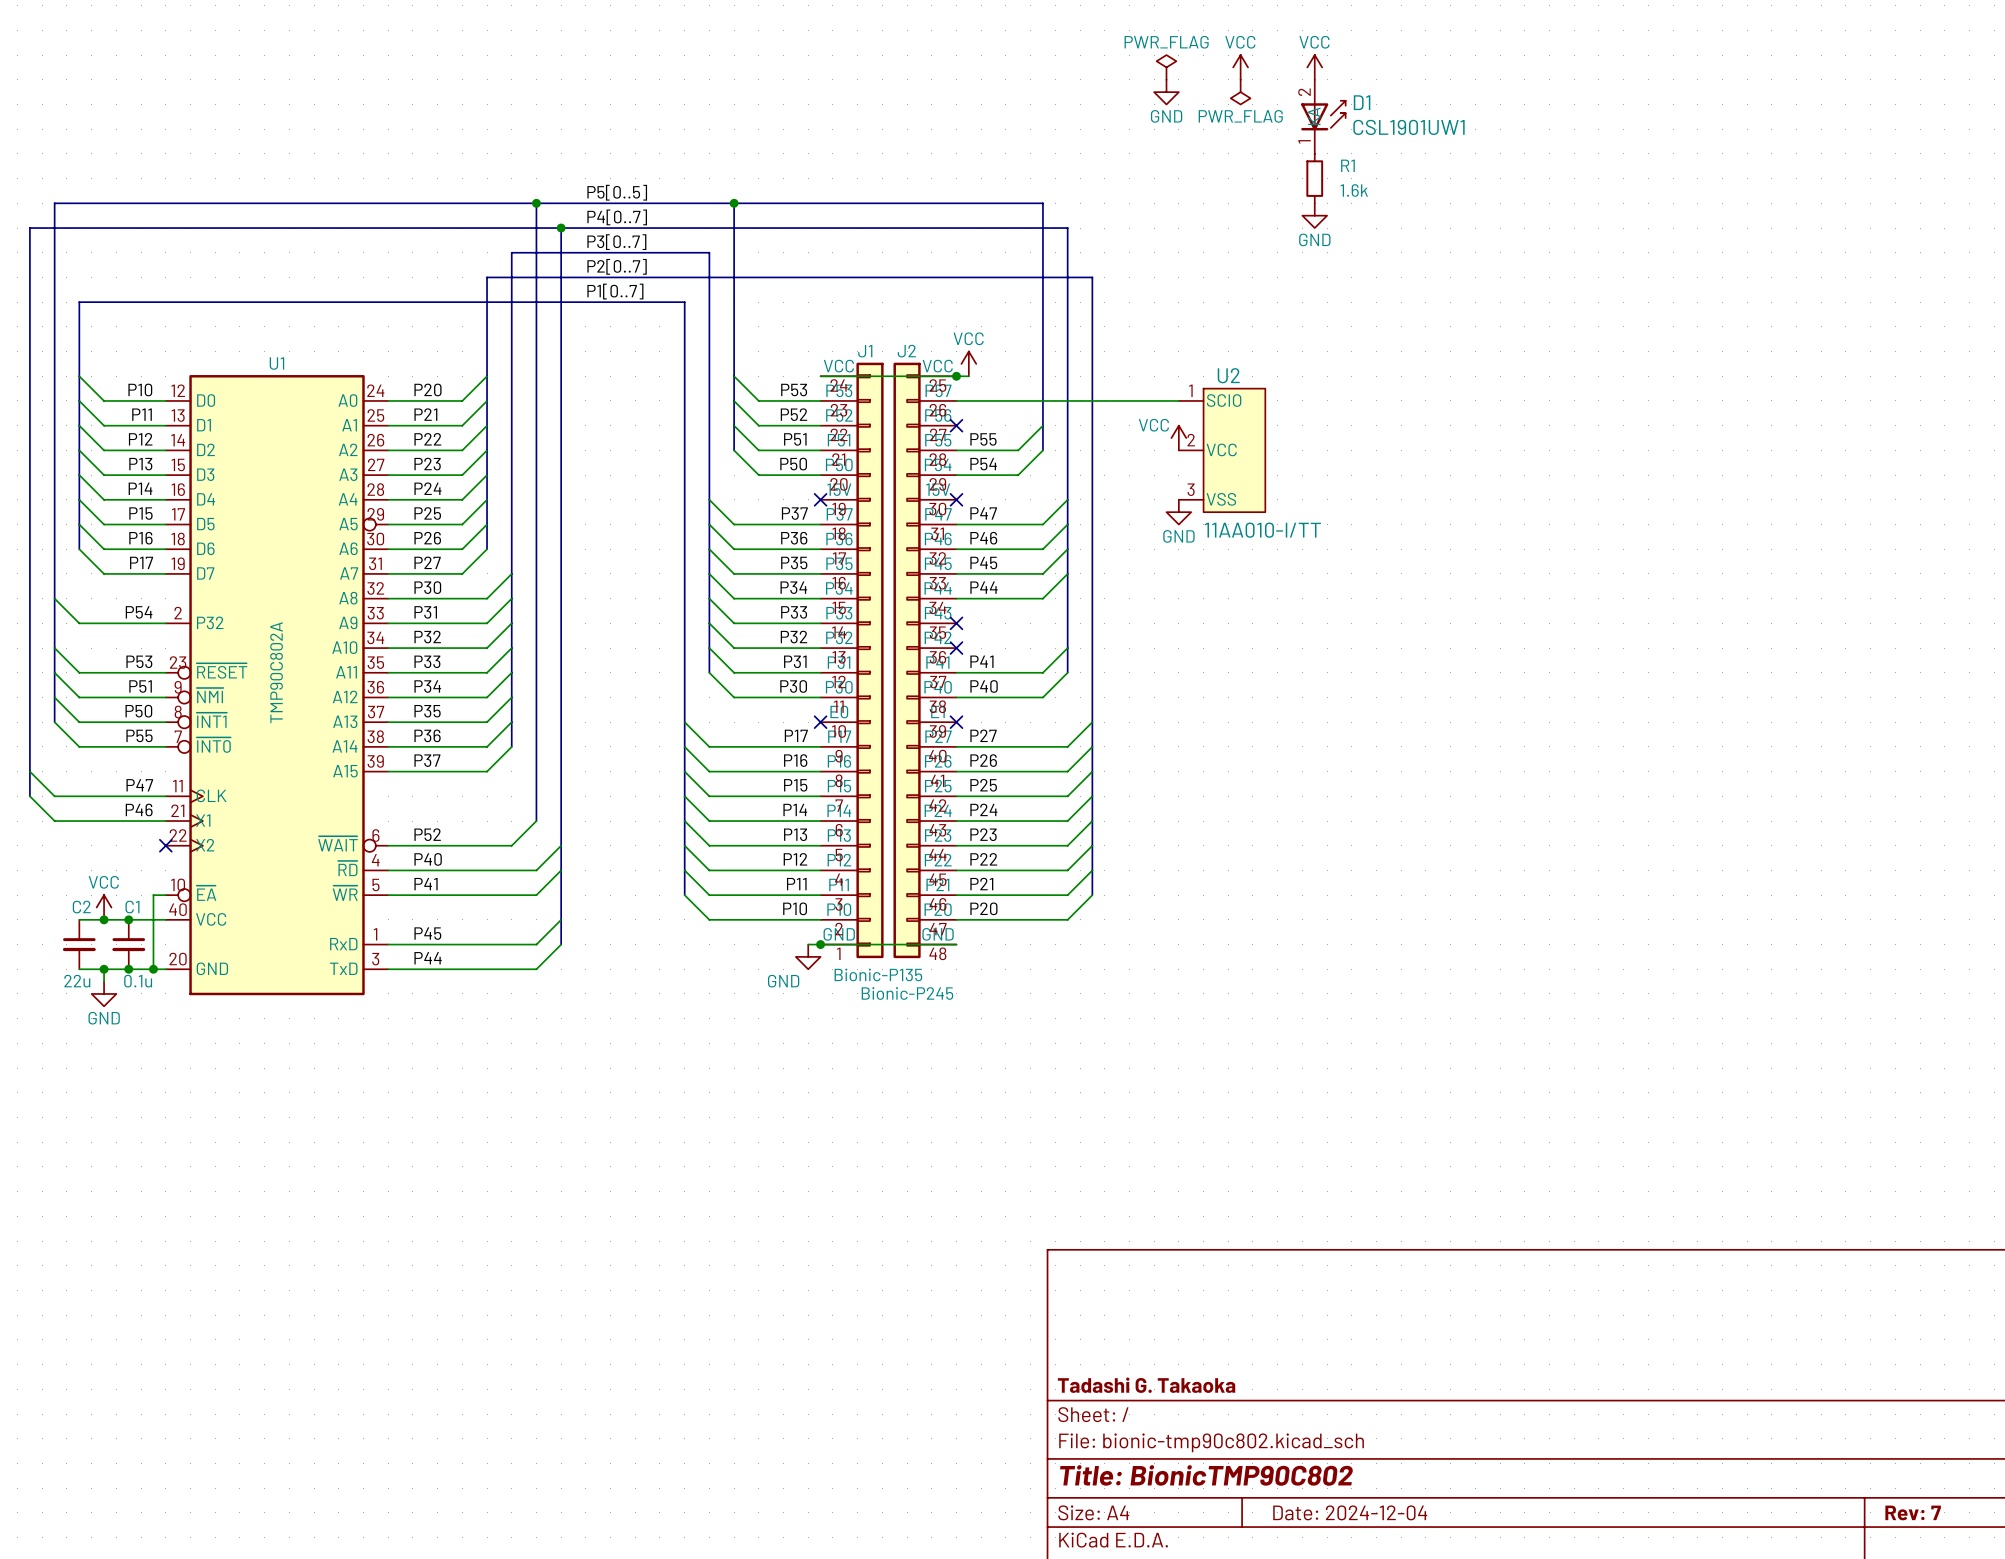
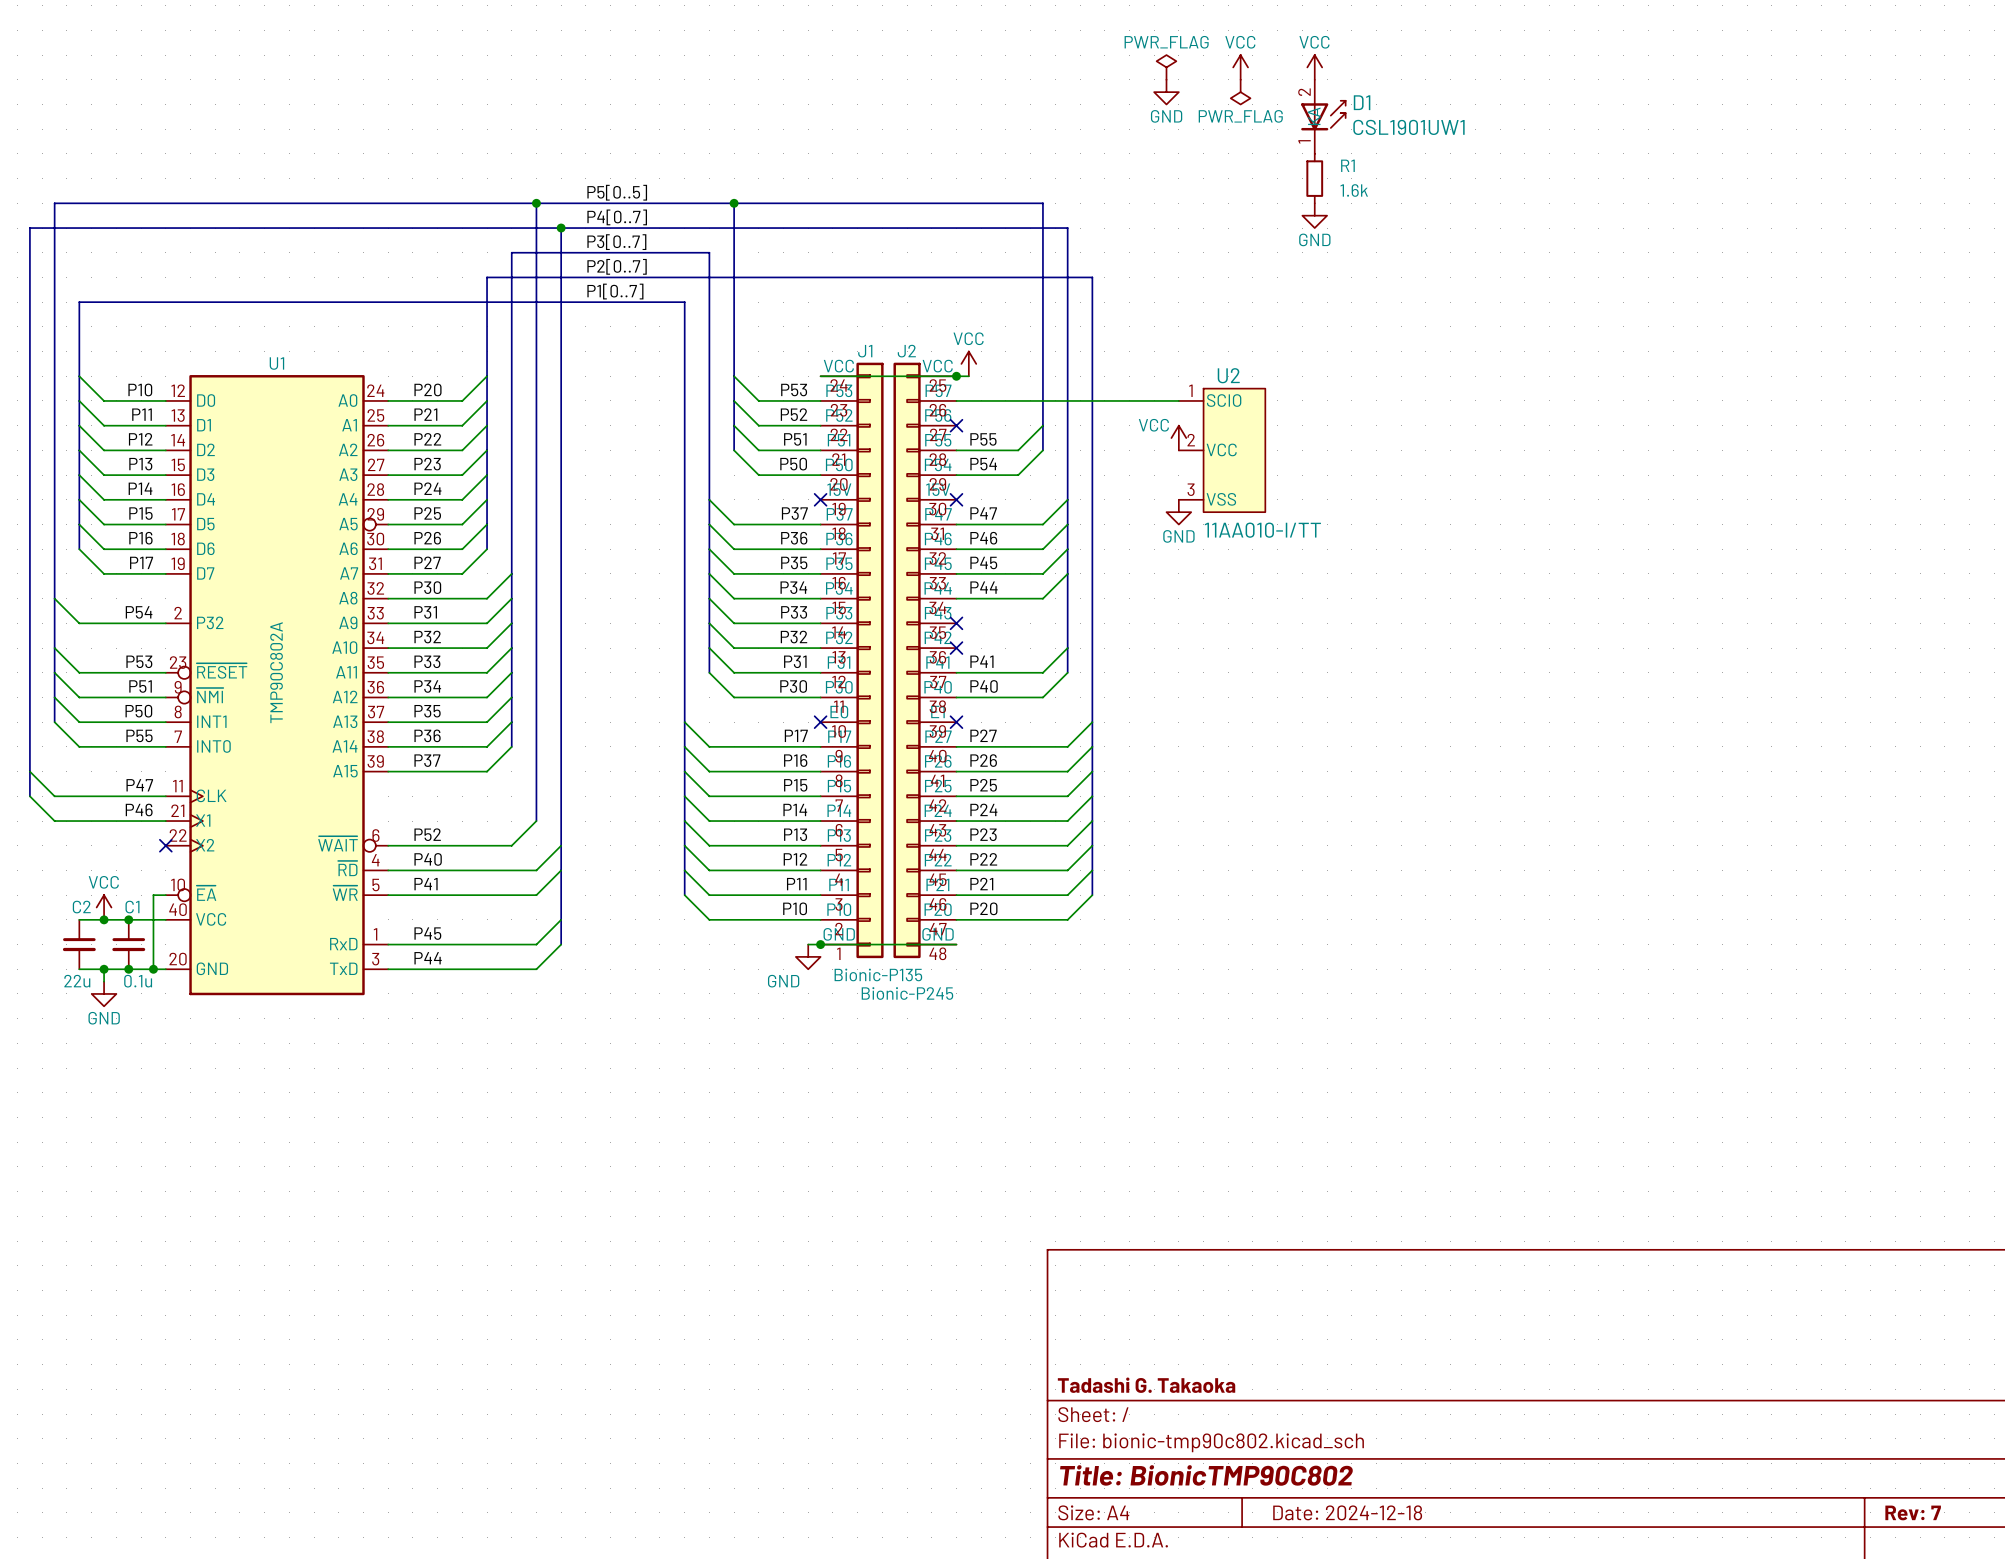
U1 symbol: [165, 375, 389, 996] -> [165, 375, 389, 996]
title block: Date: 2024-12-04 (1350, 1512) -> Date: 2024-12-18 (1347, 1512)

